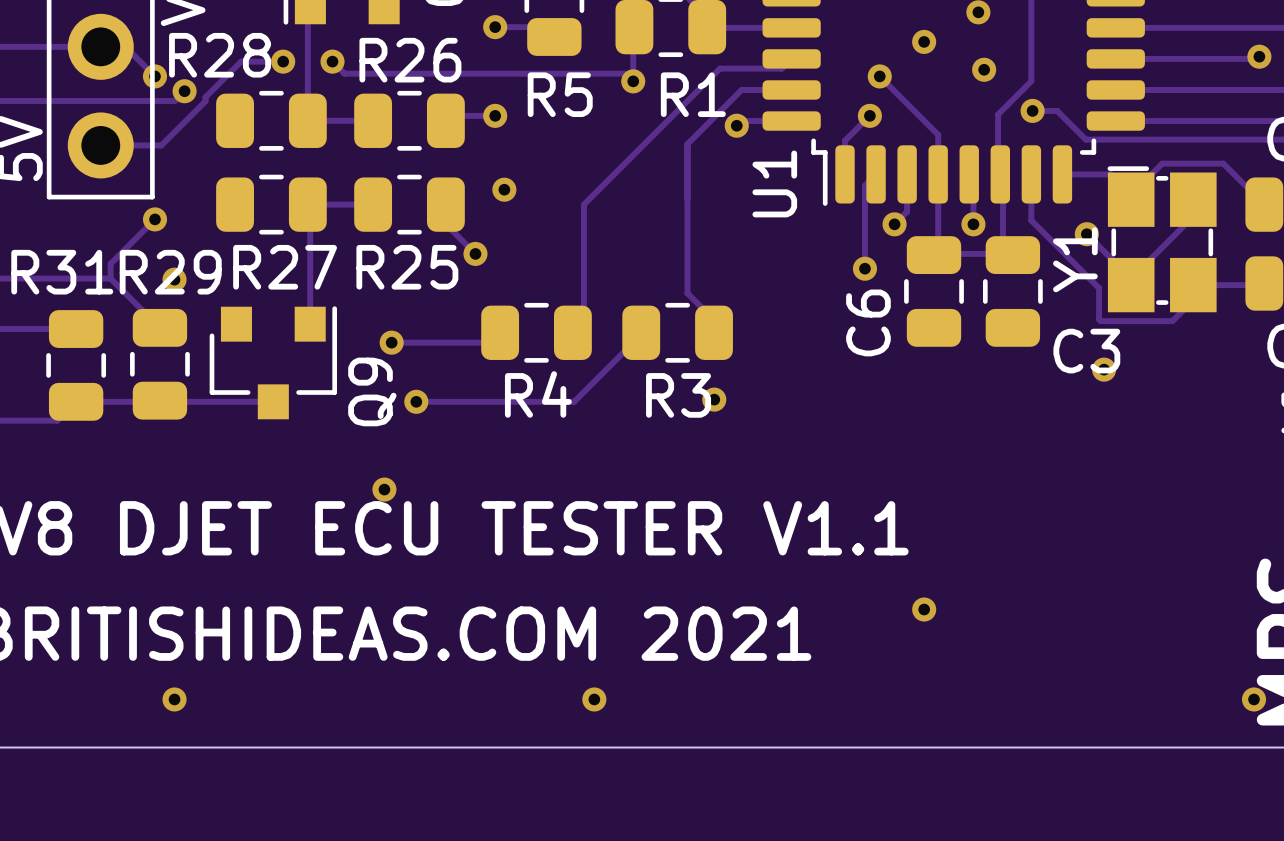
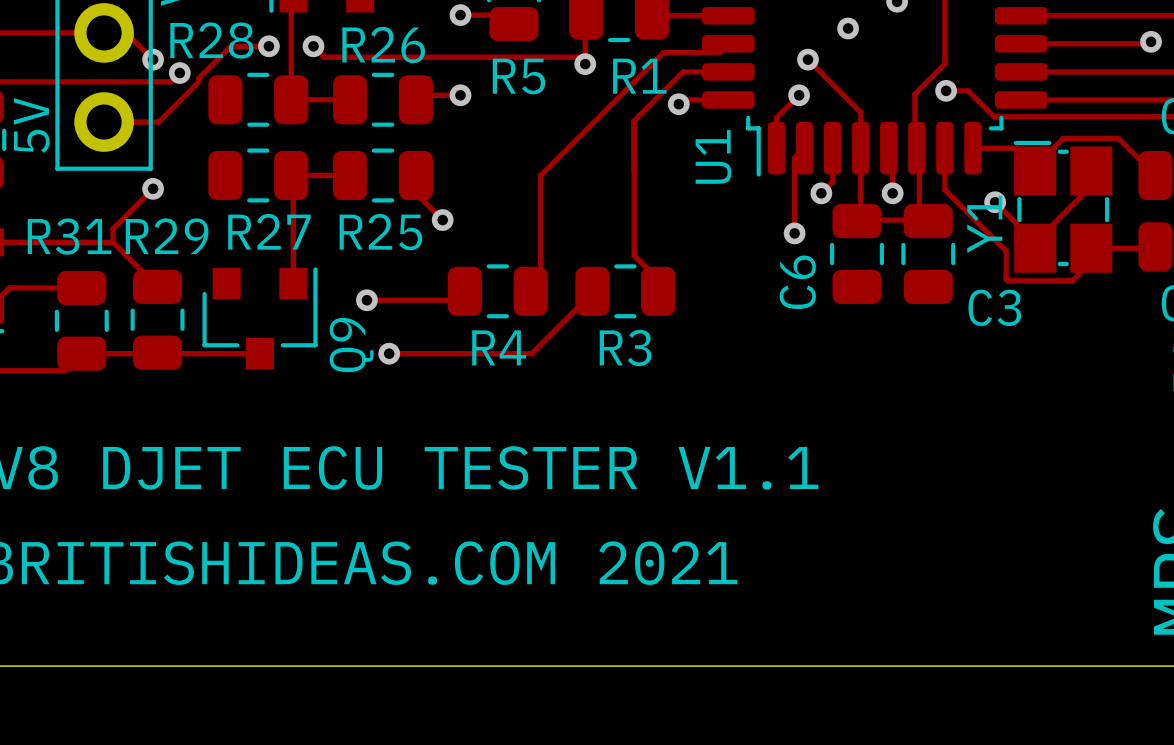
via: (984, 69) -> none
via: (504, 189) -> none
via: (174, 279) -> none
via: (1104, 369) -> none
via: (714, 399) -> none
via: (384, 489) -> none
via: (924, 609) -> none
via: (174, 699) -> none
via: (594, 699) -> none
via: (1254, 699) -> none

